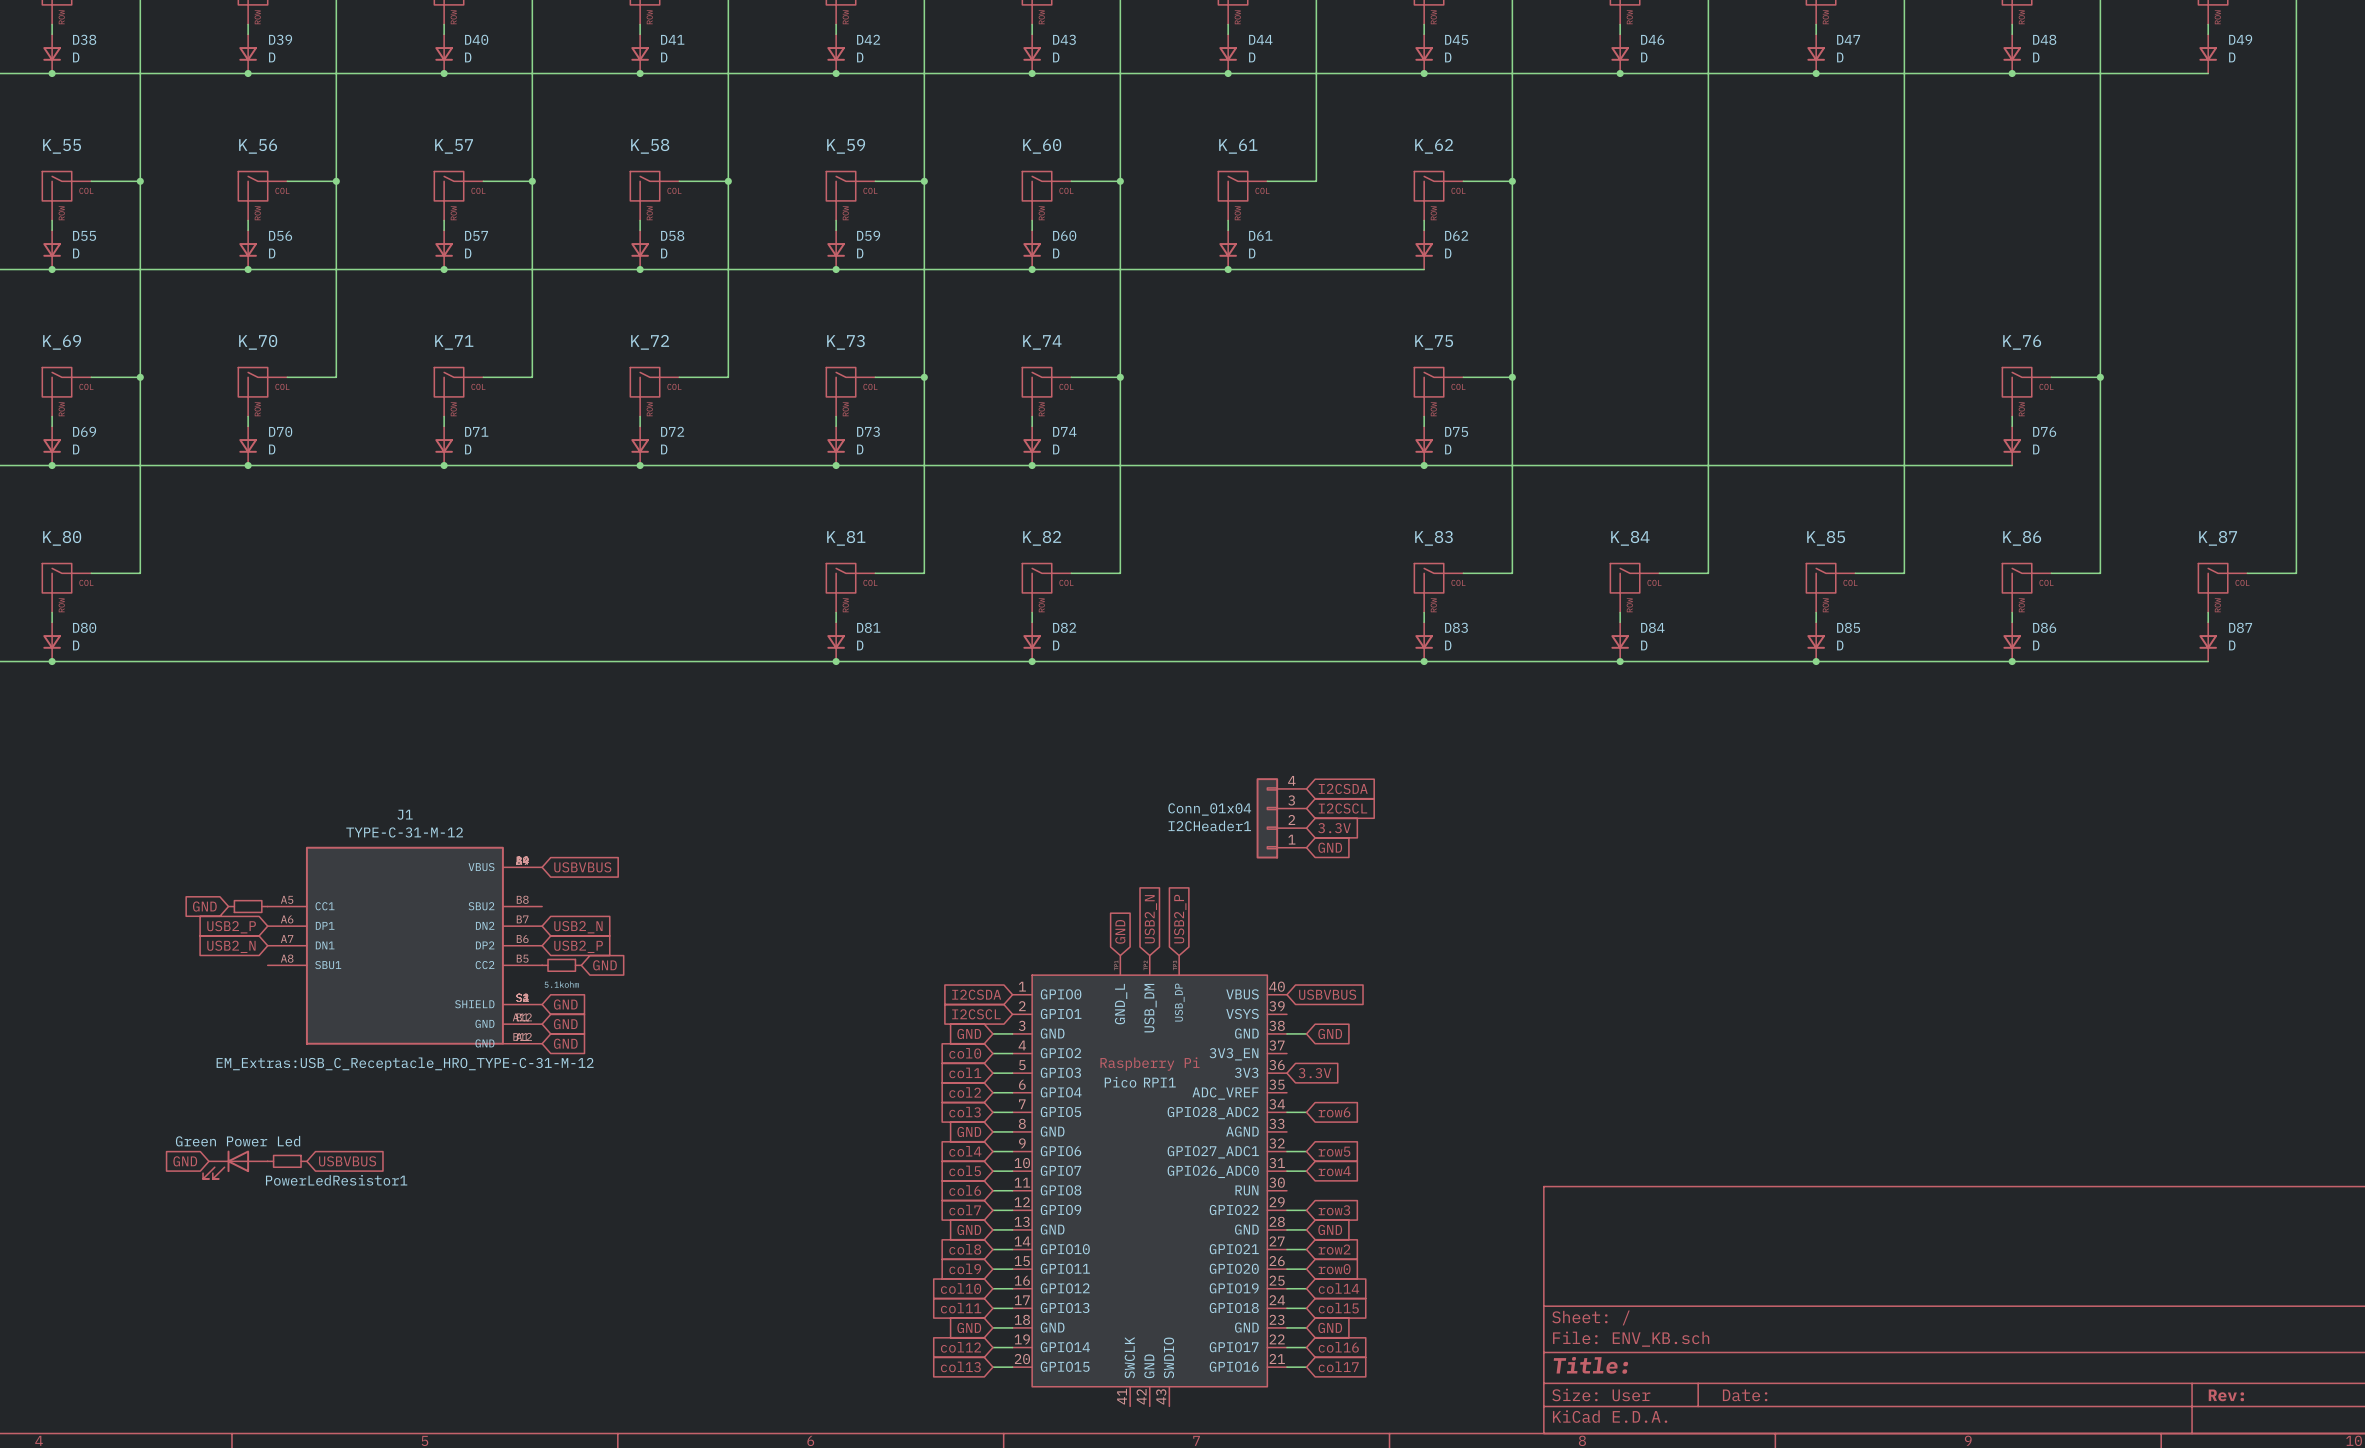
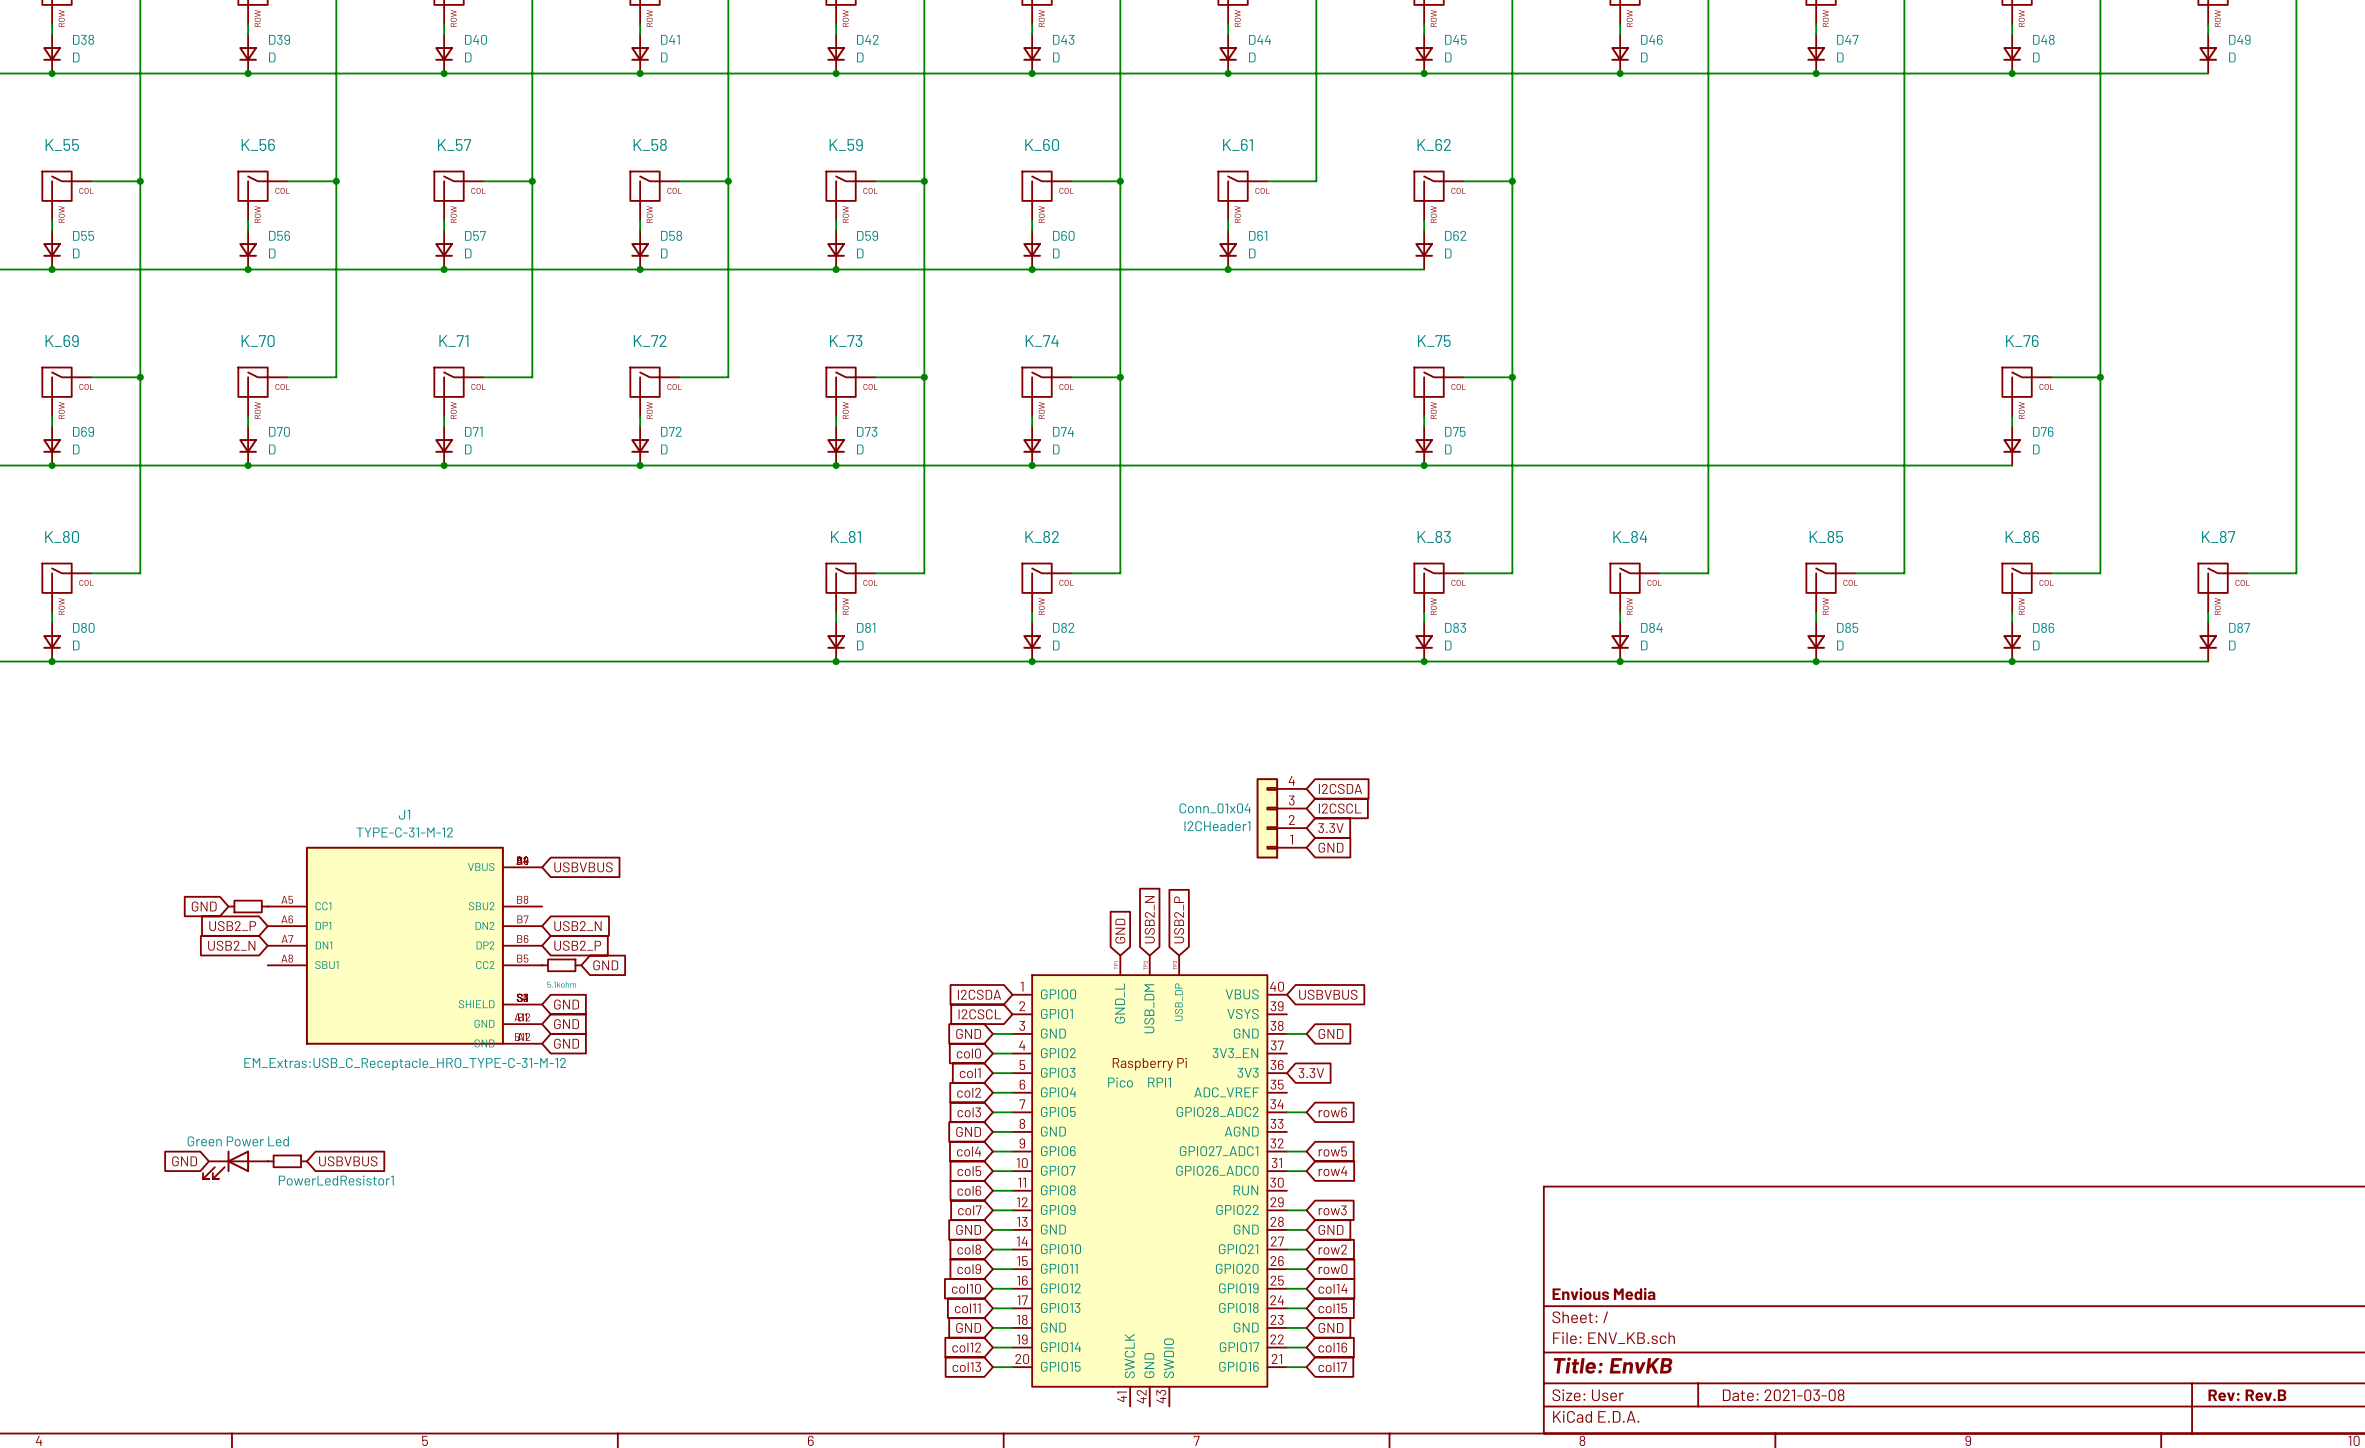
title block: none -> Envious Media (1603, 1294)
title block: Title: (1590, 1365) -> Title: EnvKB (1613, 1365)
title block: Date: (1745, 1395) -> Date: 2021-03-08 (1783, 1395)
title block: Rev: (2226, 1395) -> Rev: Rev.B (2247, 1395)

